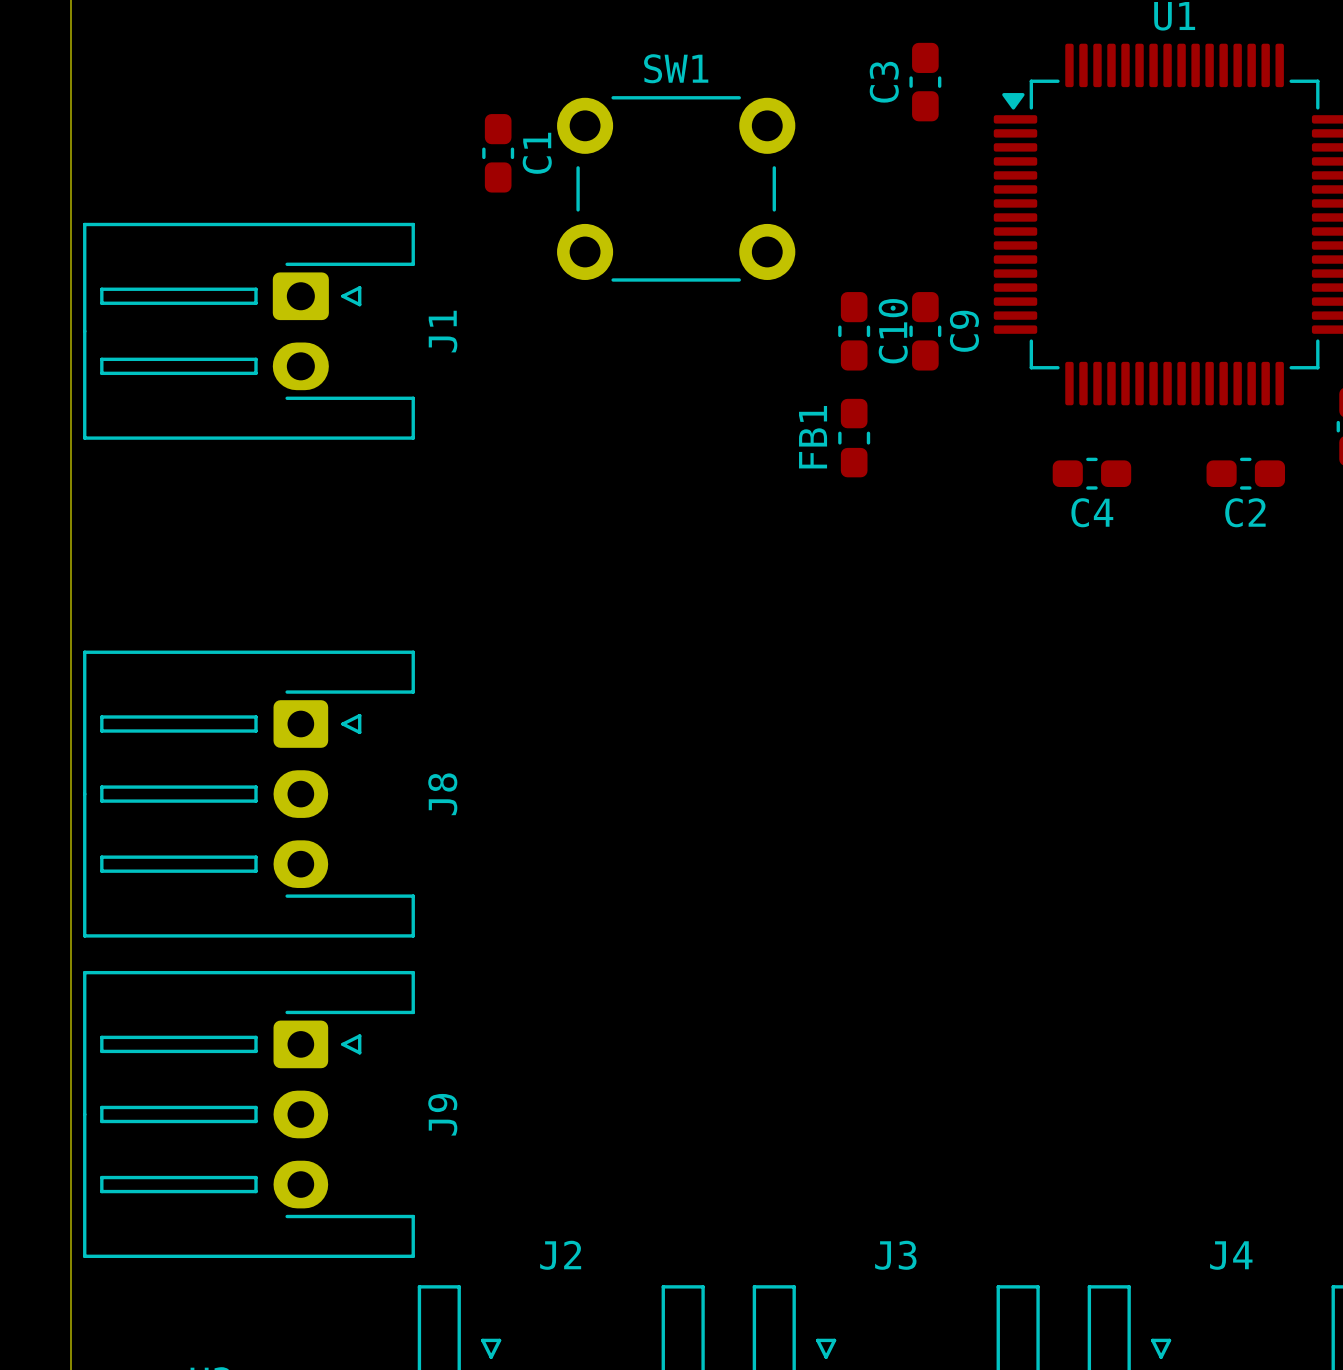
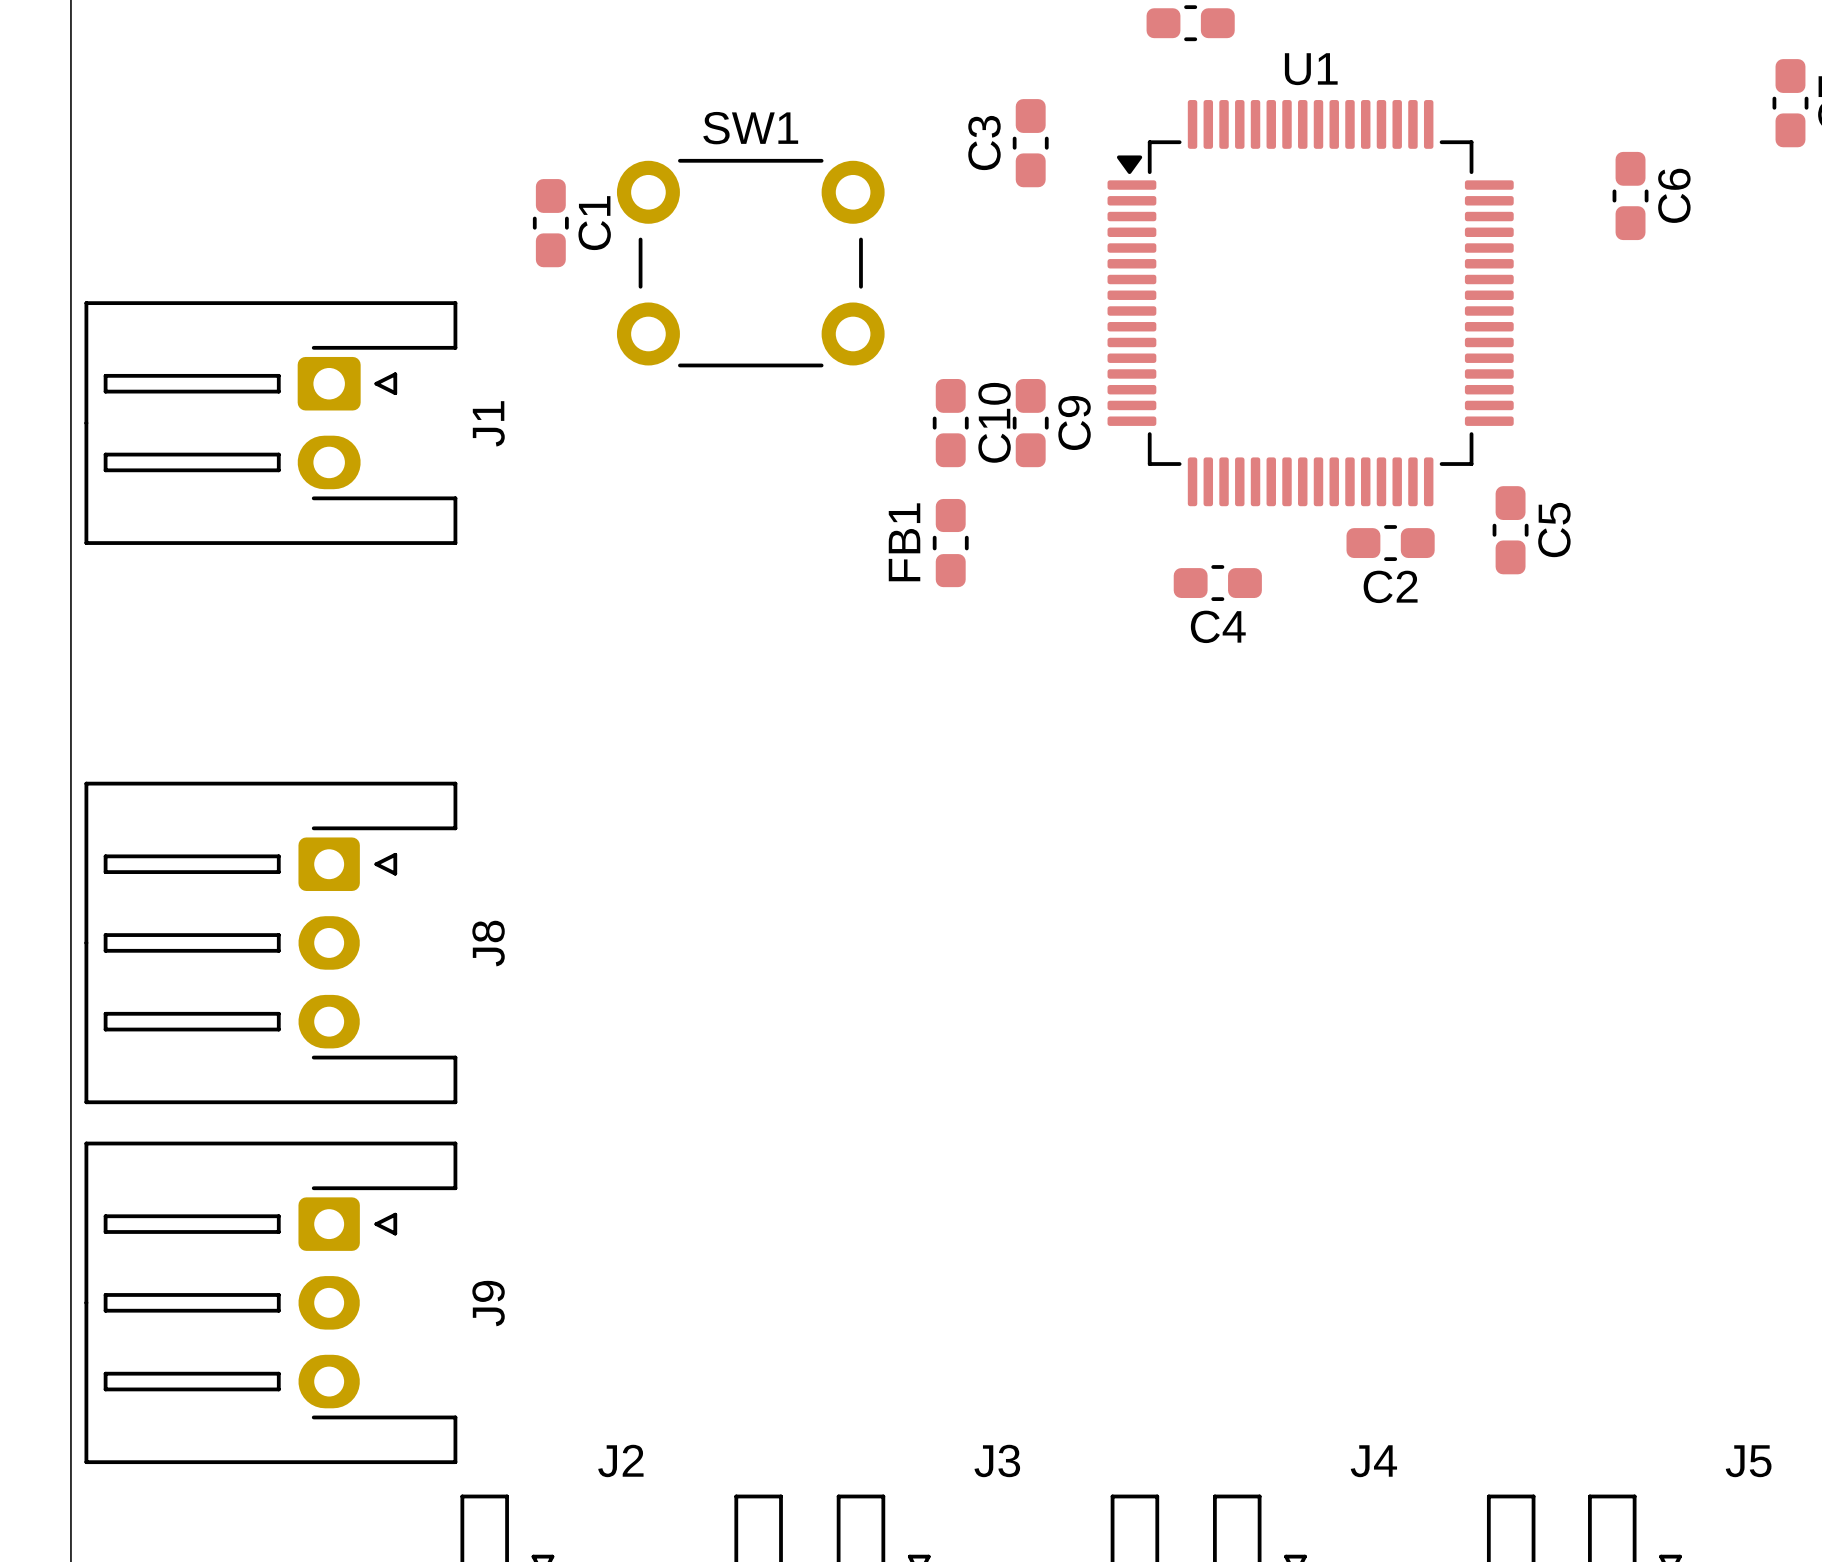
C2 position: (1245, 473) -> (1390, 543)

